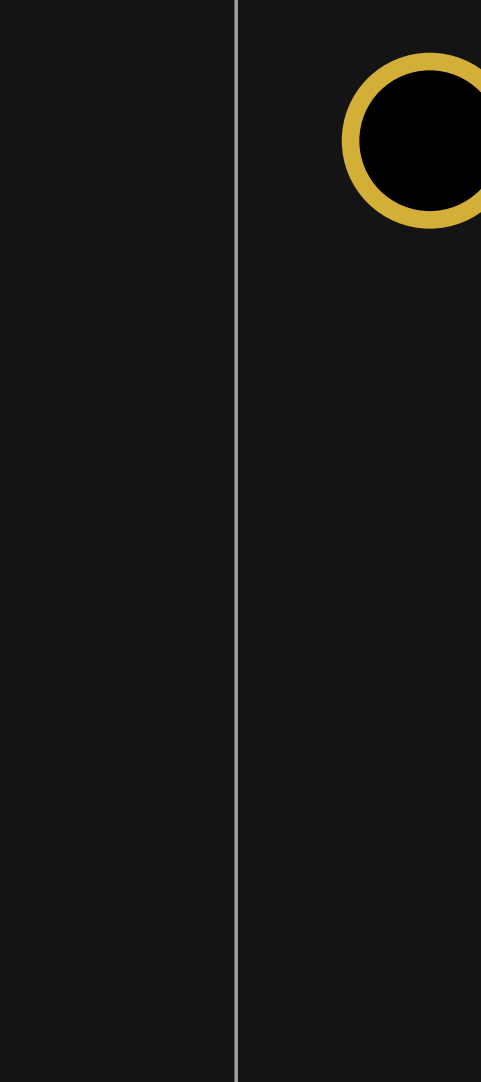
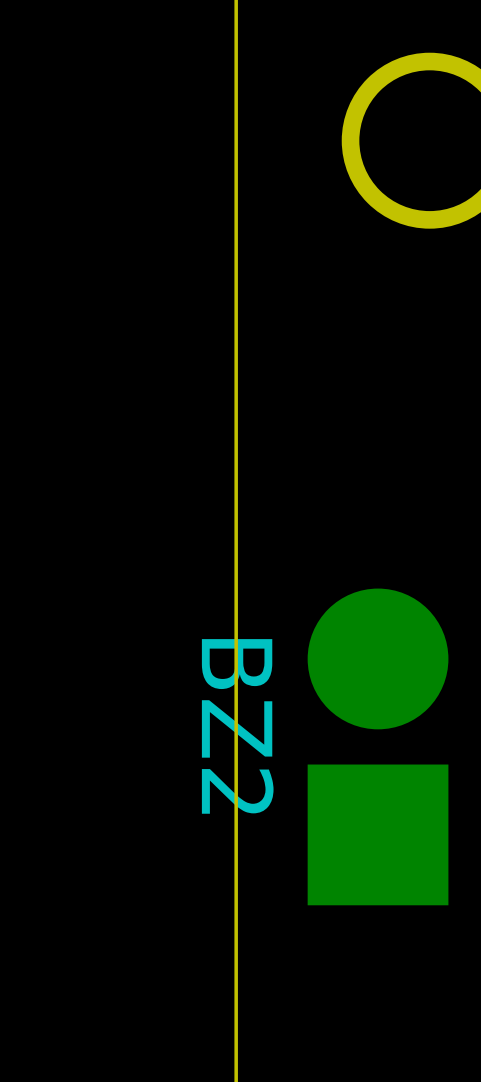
BZ2: none -> (378, 746)

